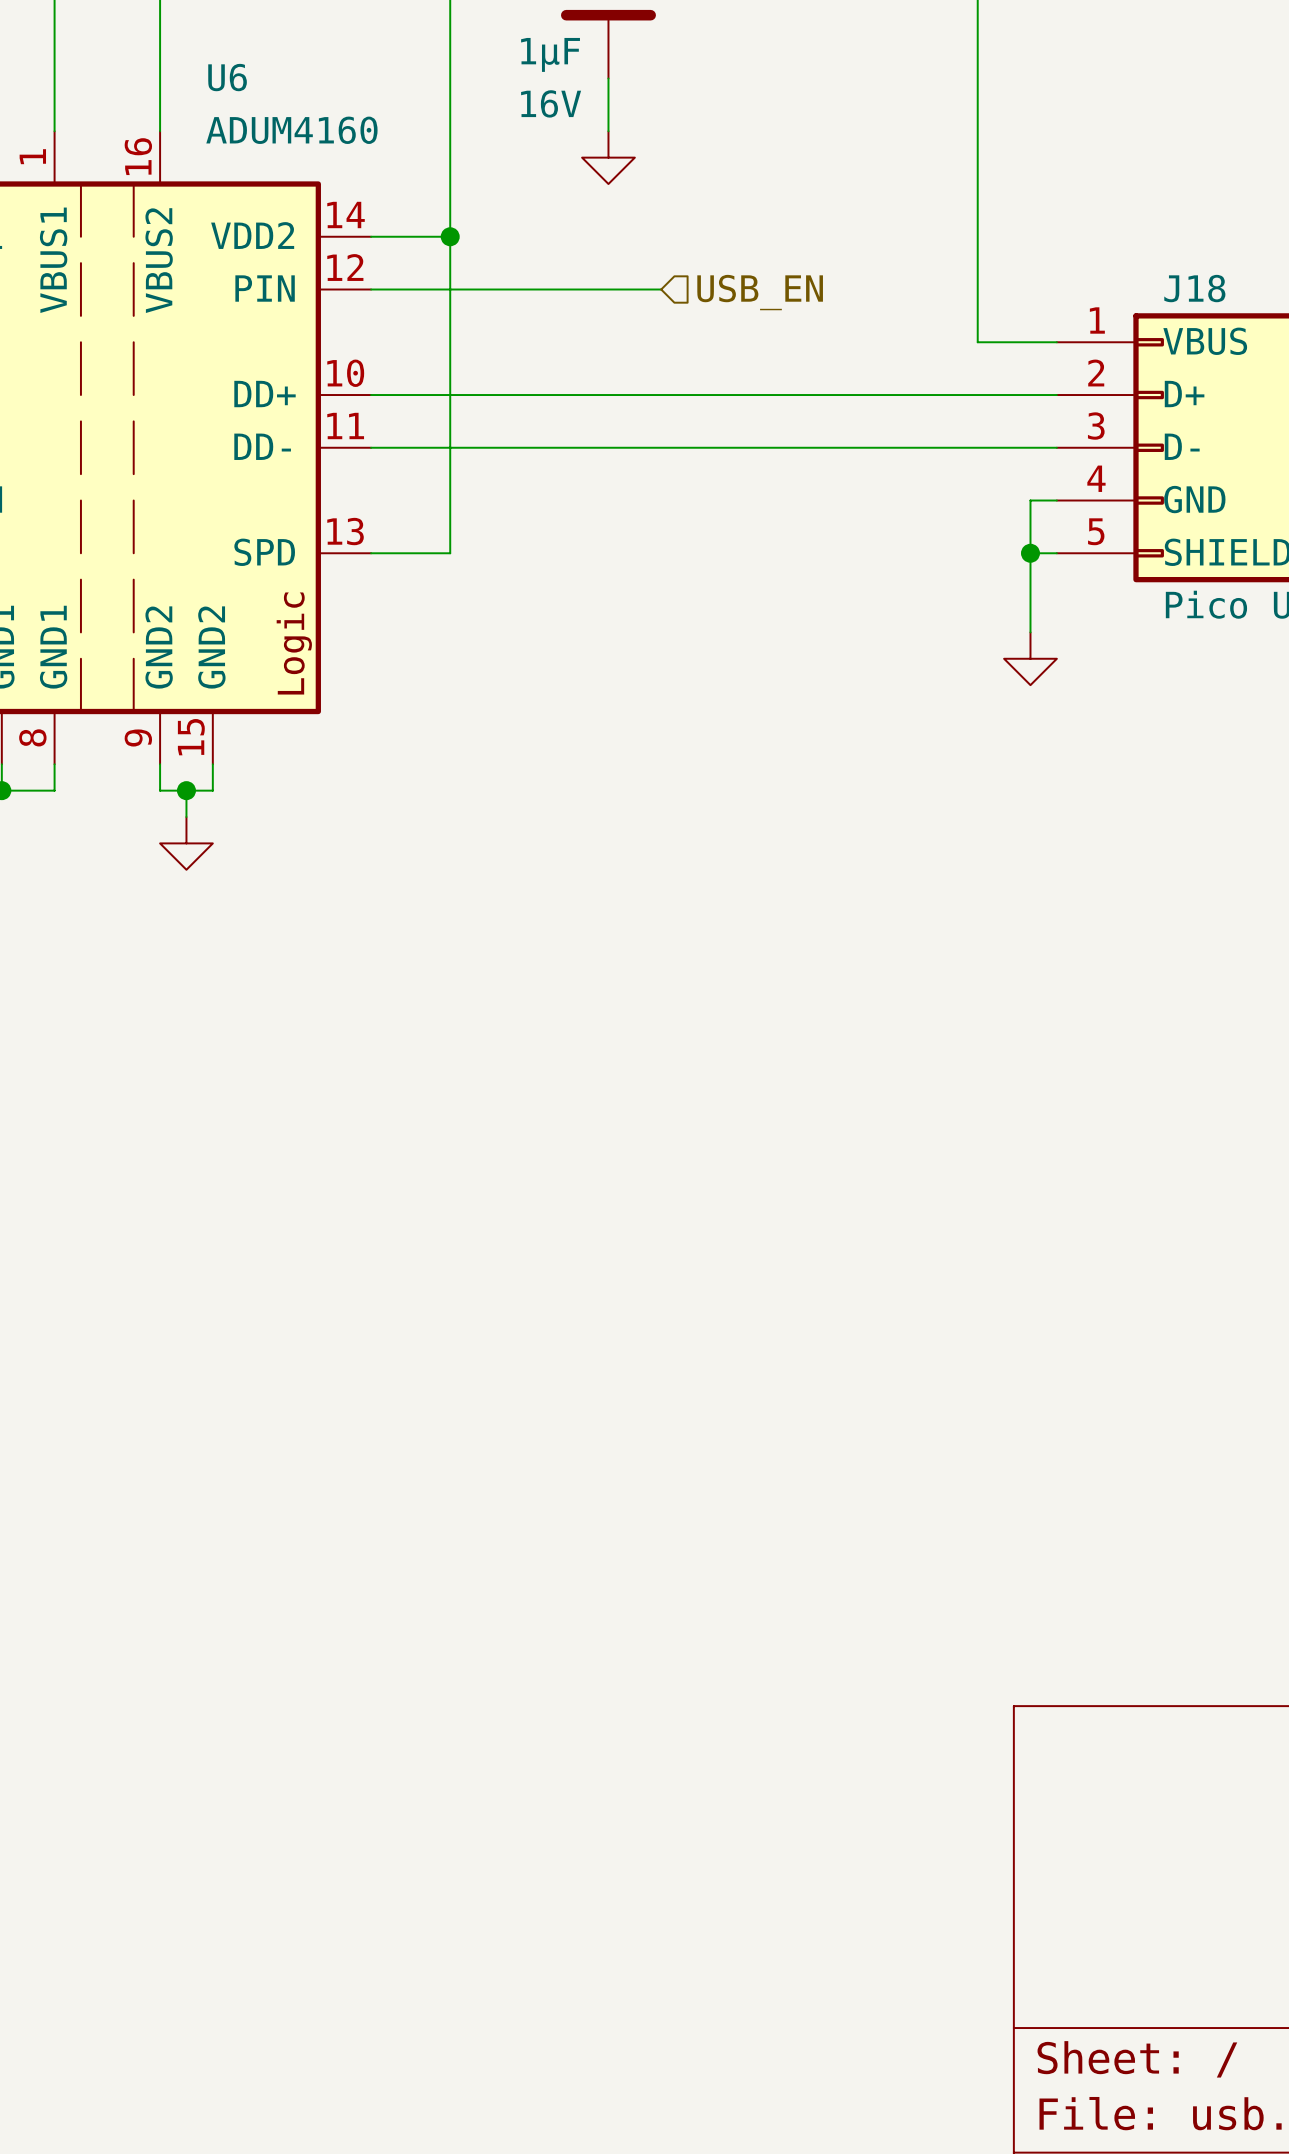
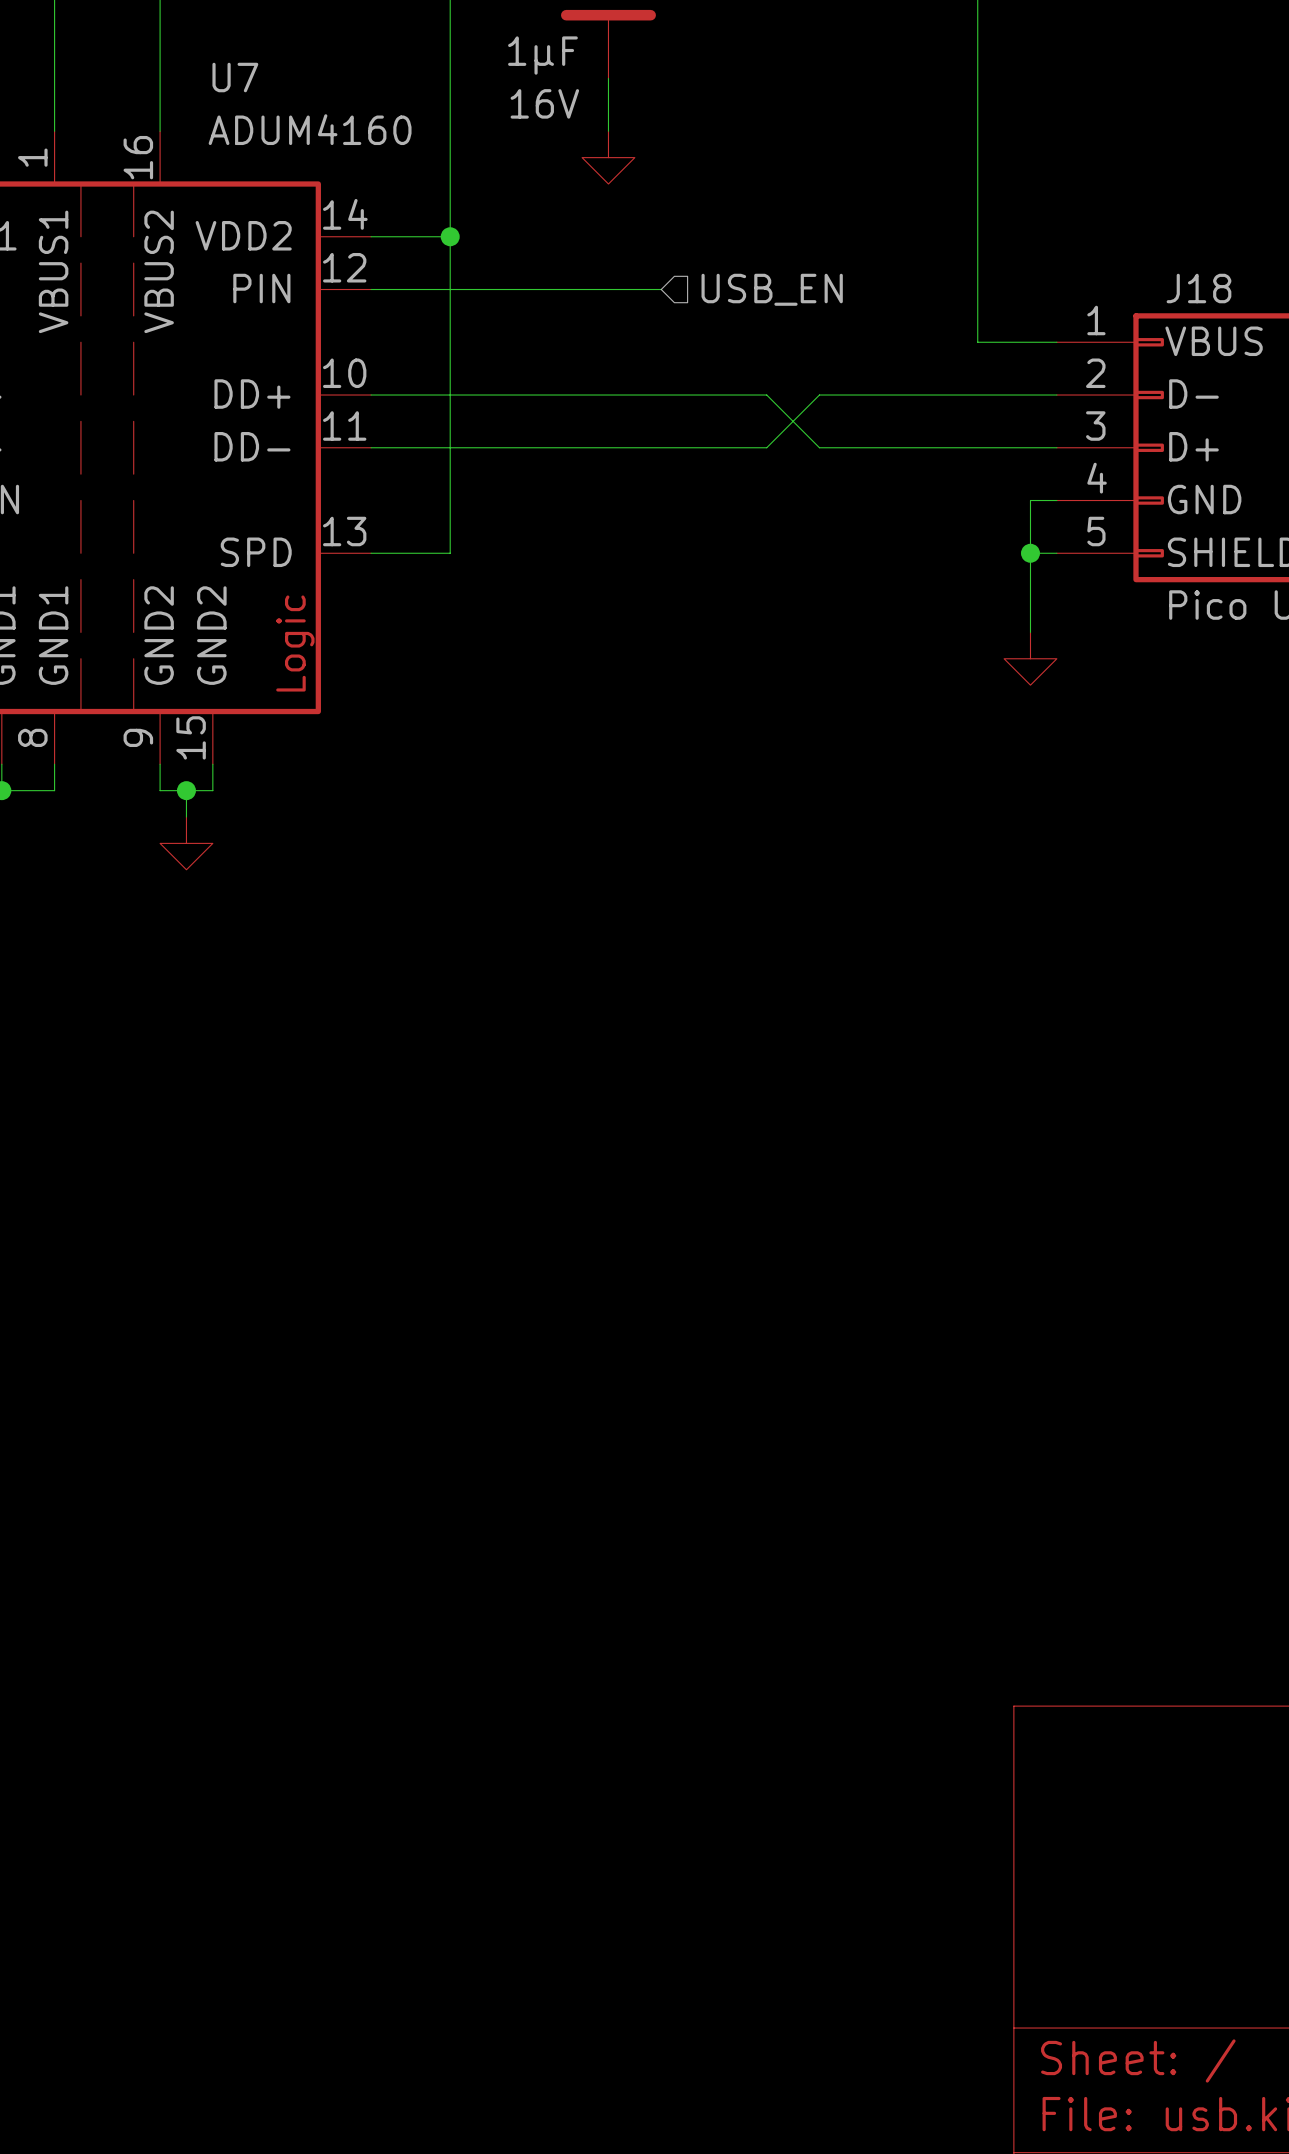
U6 name: U6 (227, 77) -> U7 (235, 77)
J18 text: D+ (1184, 394) -> D- (1193, 394)
wire: (766, 395) (819, 395) -> (766, 395) (819, 447)
J18 text: D- (1182, 446) -> D+ (1193, 446)
wire: (766, 447) (819, 447) -> (766, 447) (819, 395)

